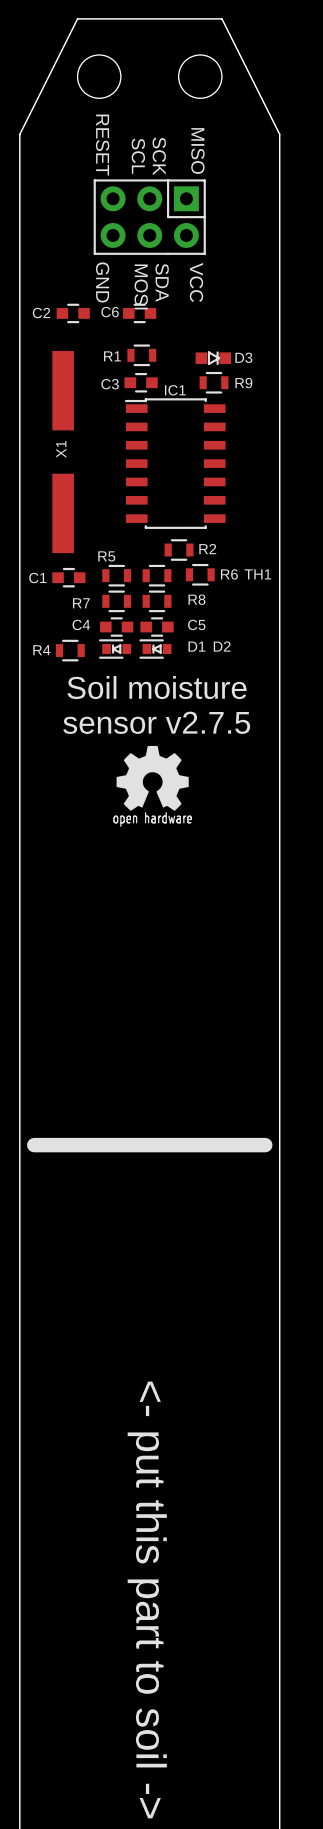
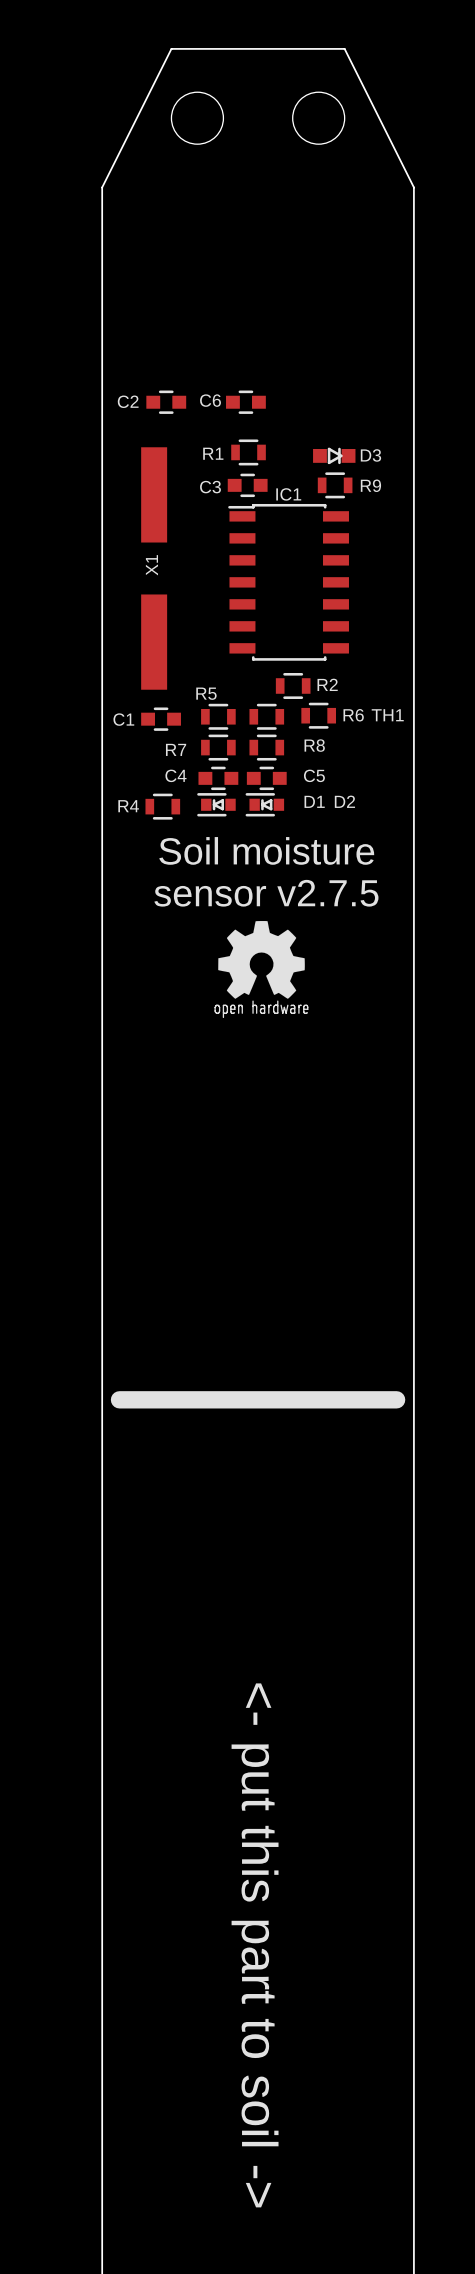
text: RESET (102, 145) -> none
text: MISO (197, 151) -> none
text: SCL (138, 156) -> none
text: SCK (159, 156) -> none
part: (149, 217) -> none
text: GND (102, 282) -> none
text: SDA (162, 282) -> none
text: VCC (196, 282) -> none
text: MOSI (141, 286) -> none

